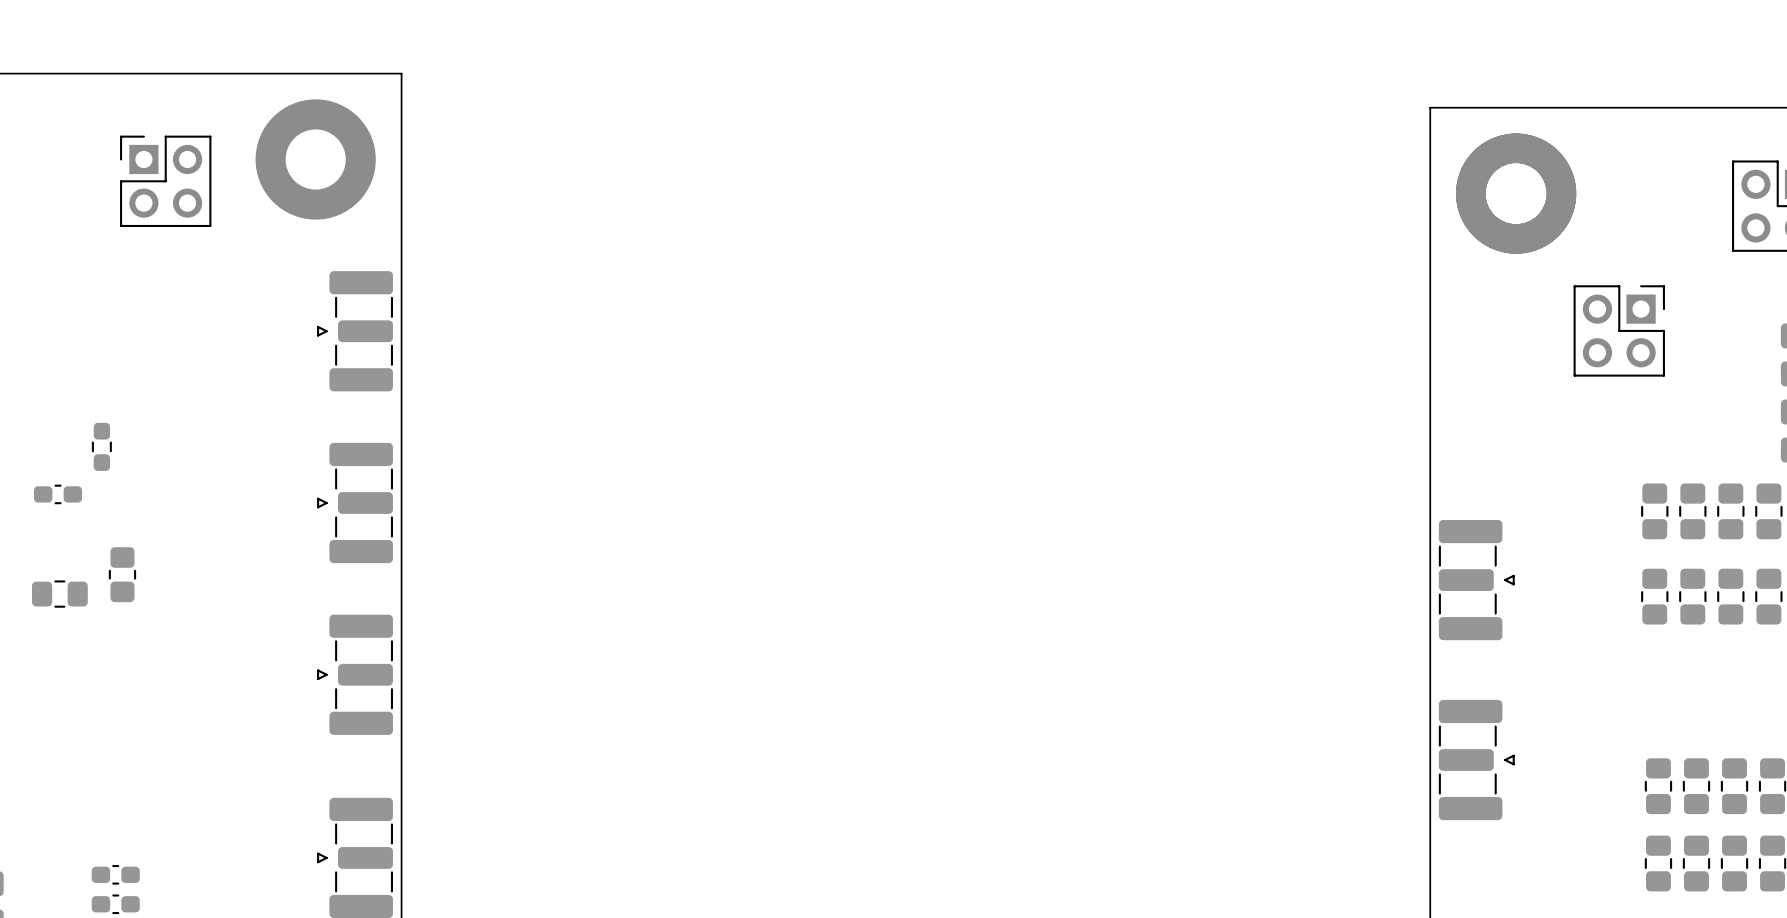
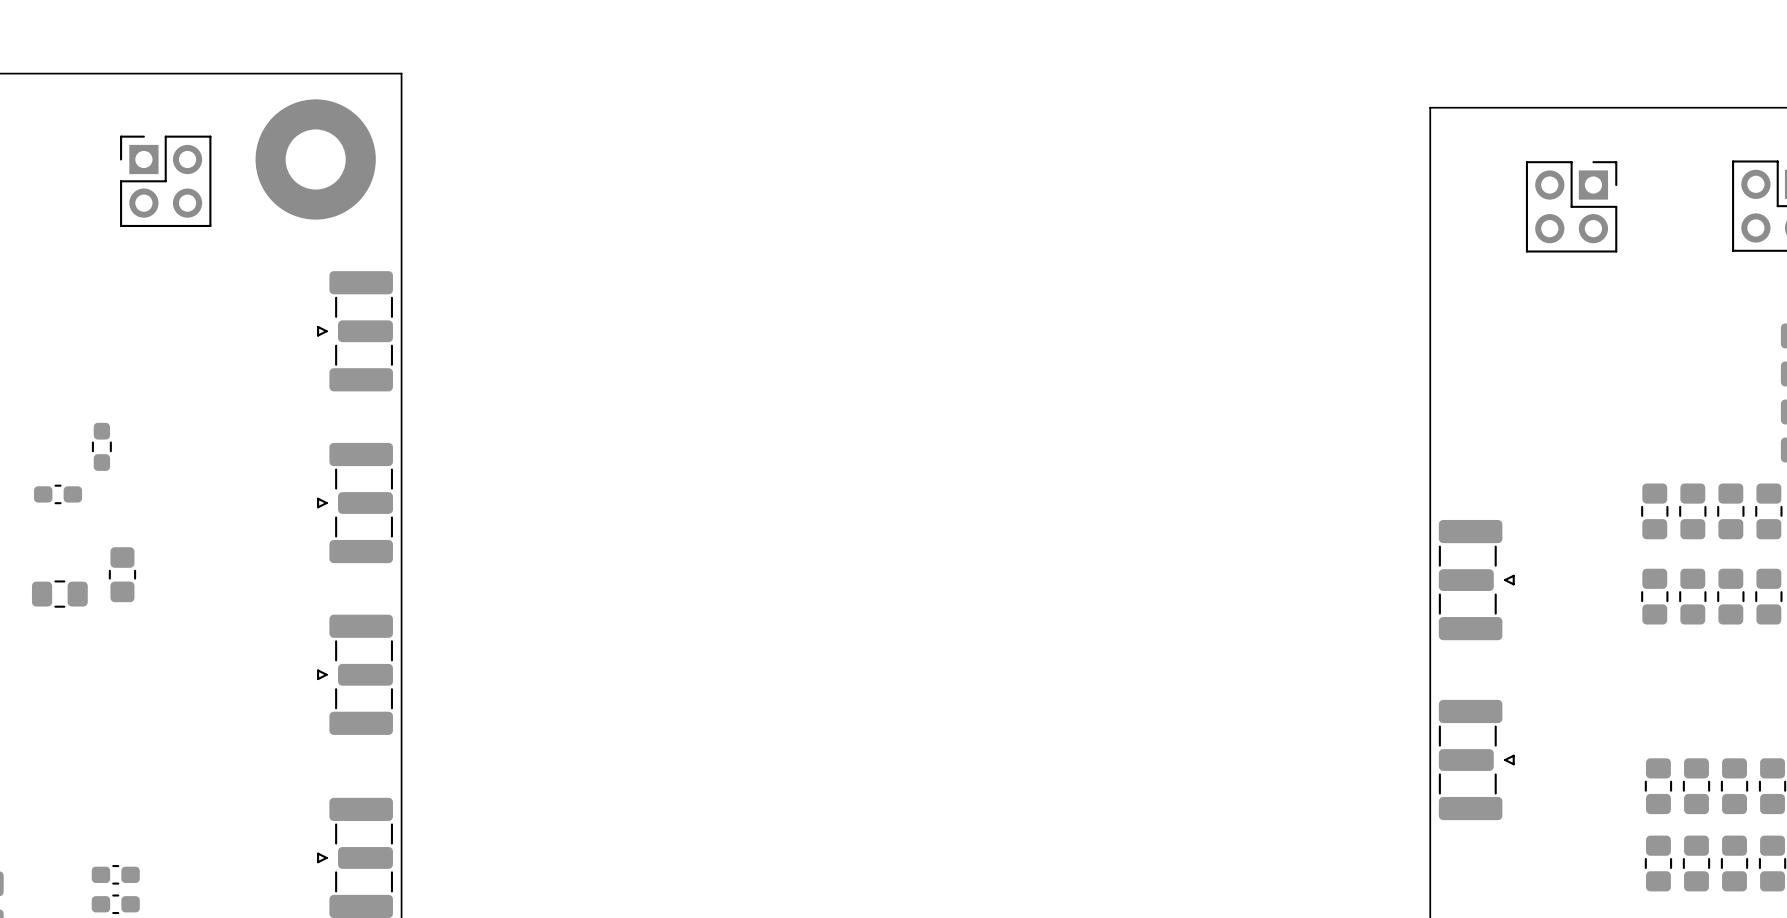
part: (1516, 193) -> none
part position: (1619, 330) -> (1571, 206)

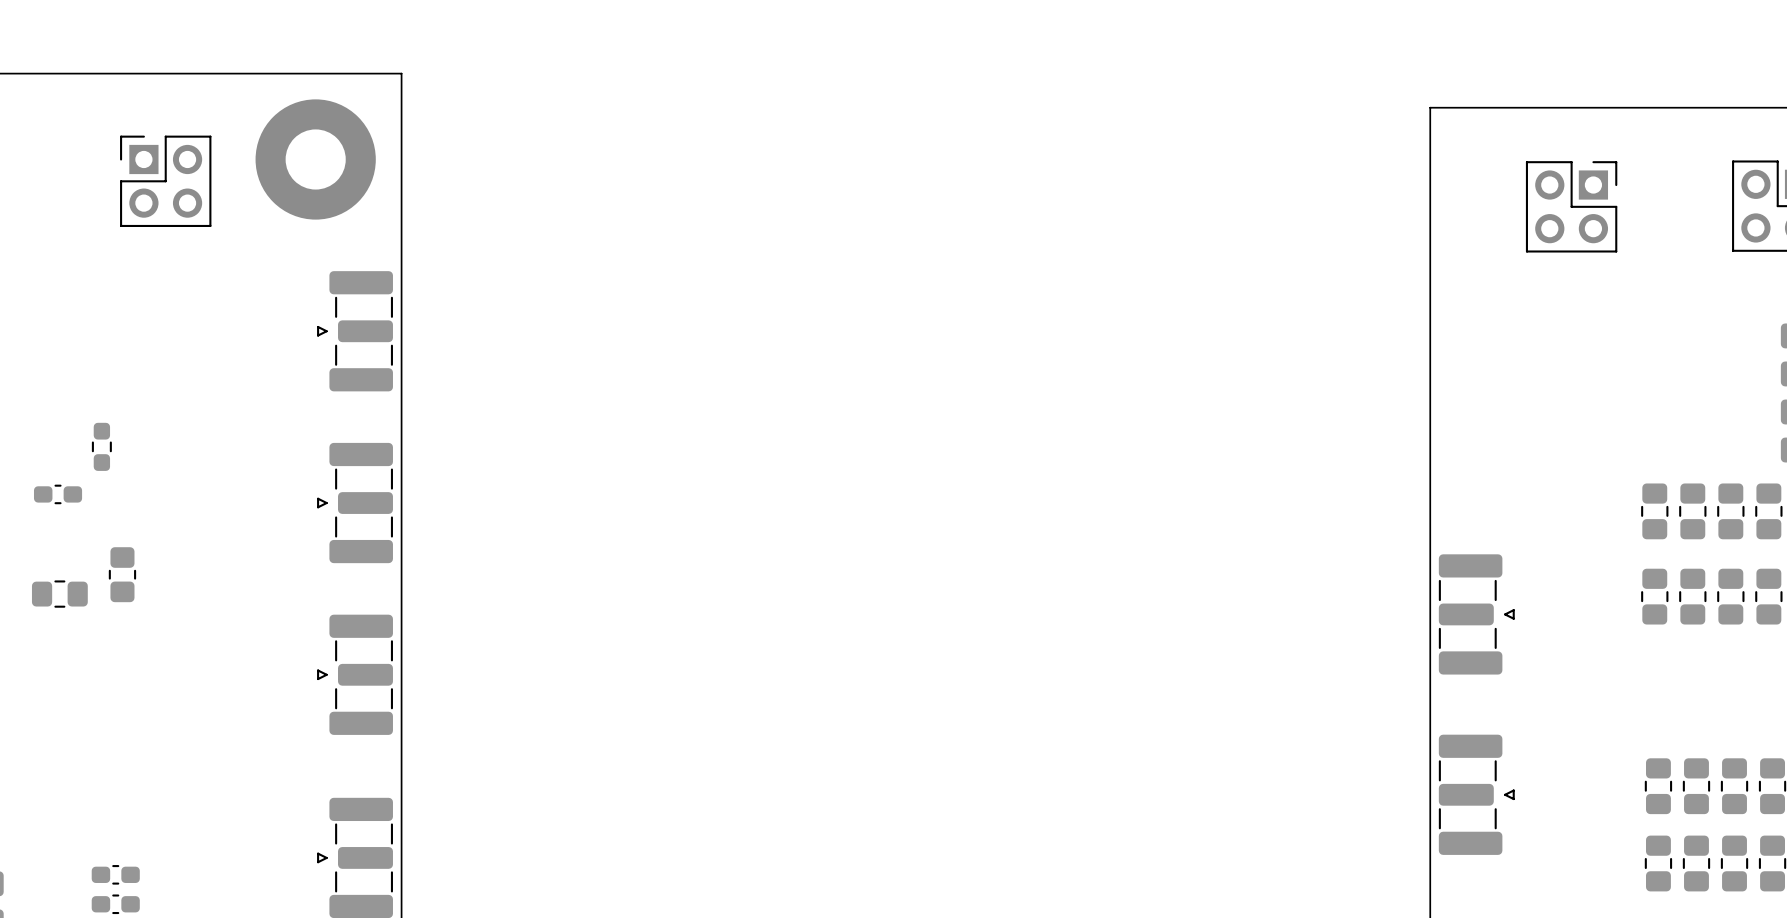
part position: (1476, 580) -> (1476, 614)
part position: (1476, 760) -> (1476, 794)

